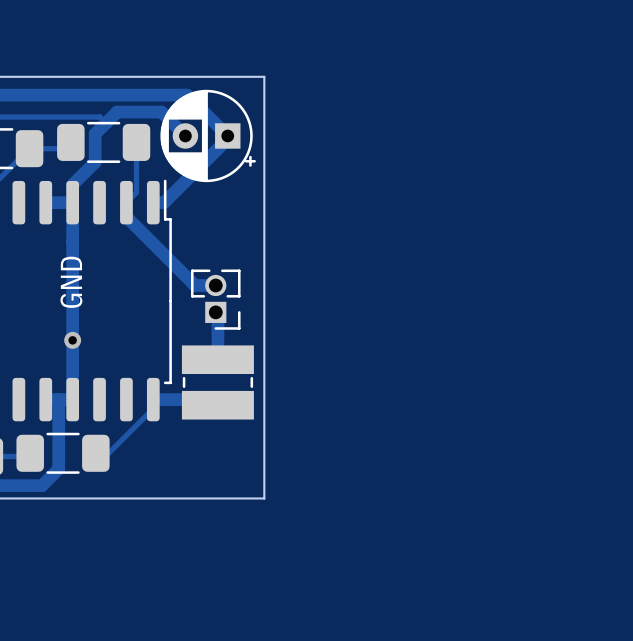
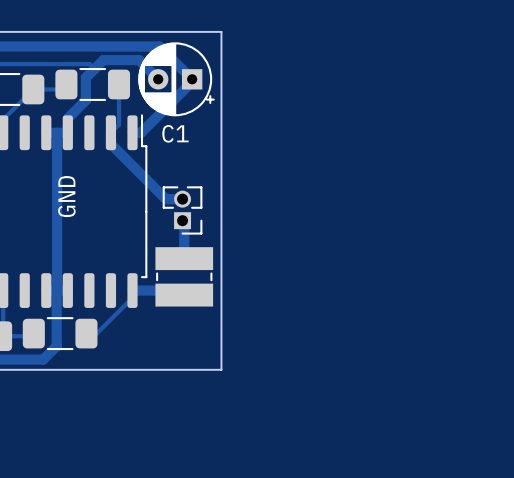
track: none -> (57, 132) (56, 290)
track: (72, 202) (72, 399) -> none
C1 name: none -> C1 (175, 133)
via: (72, 340) -> none

